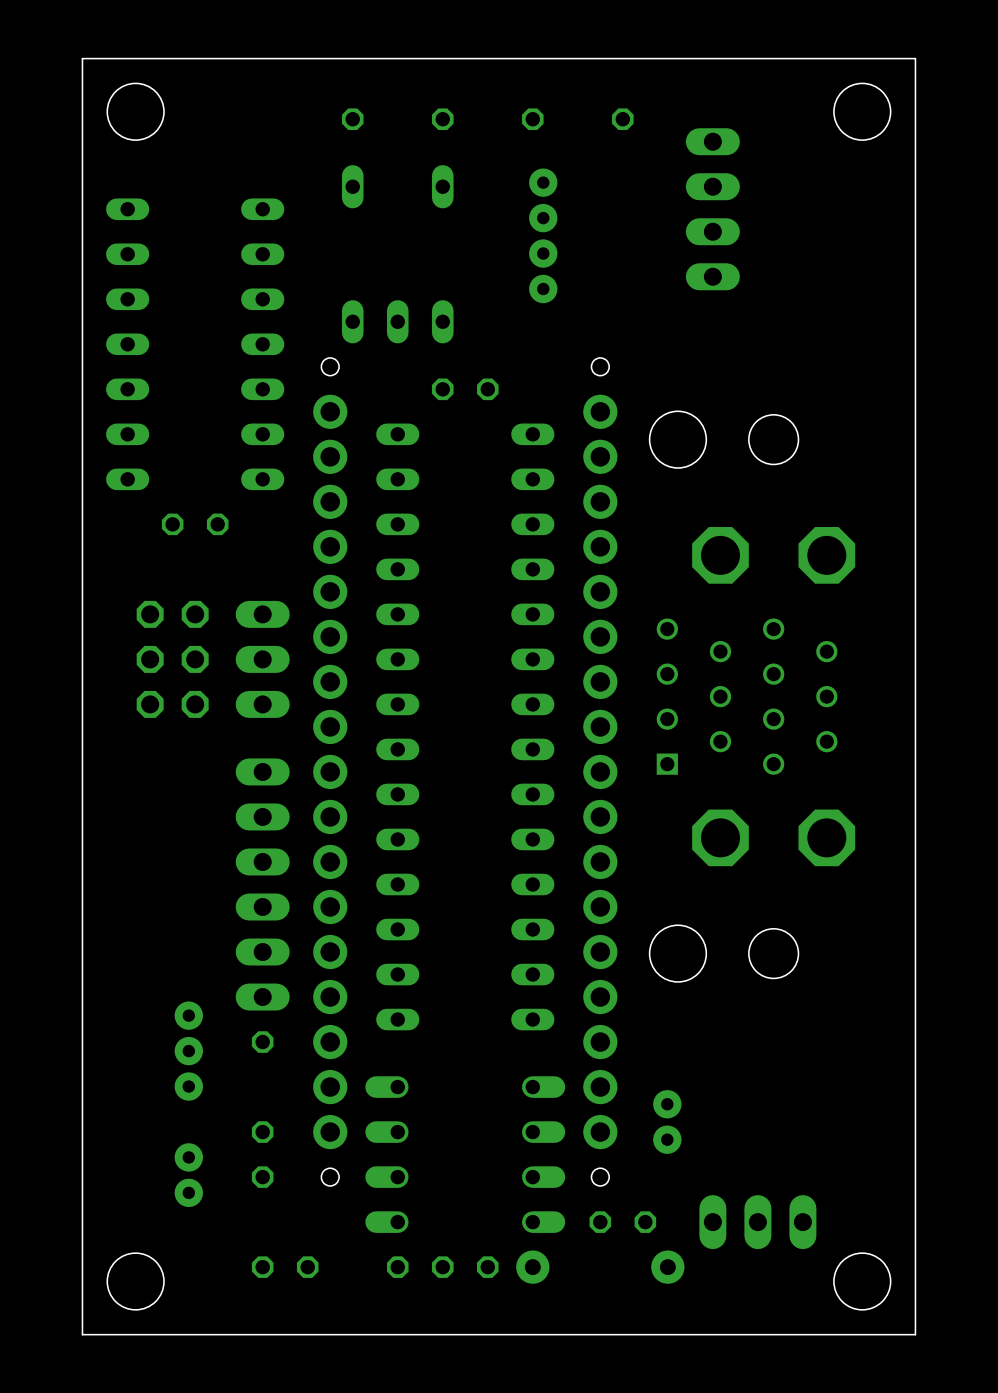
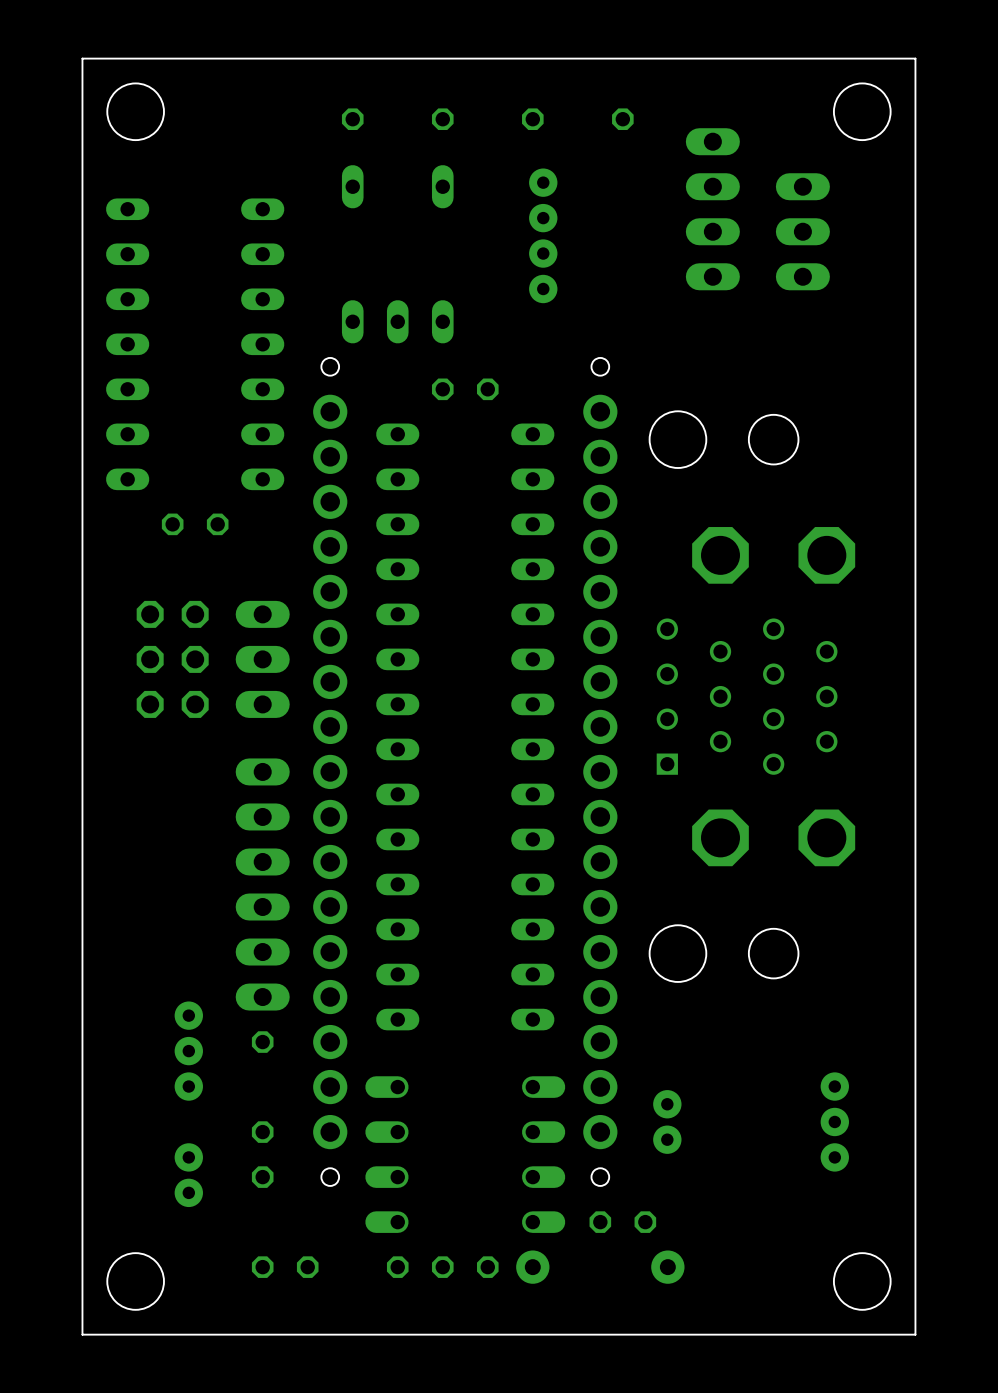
part: none -> (802, 231)
part: none -> (834, 1121)
part: (757, 1222) -> none

